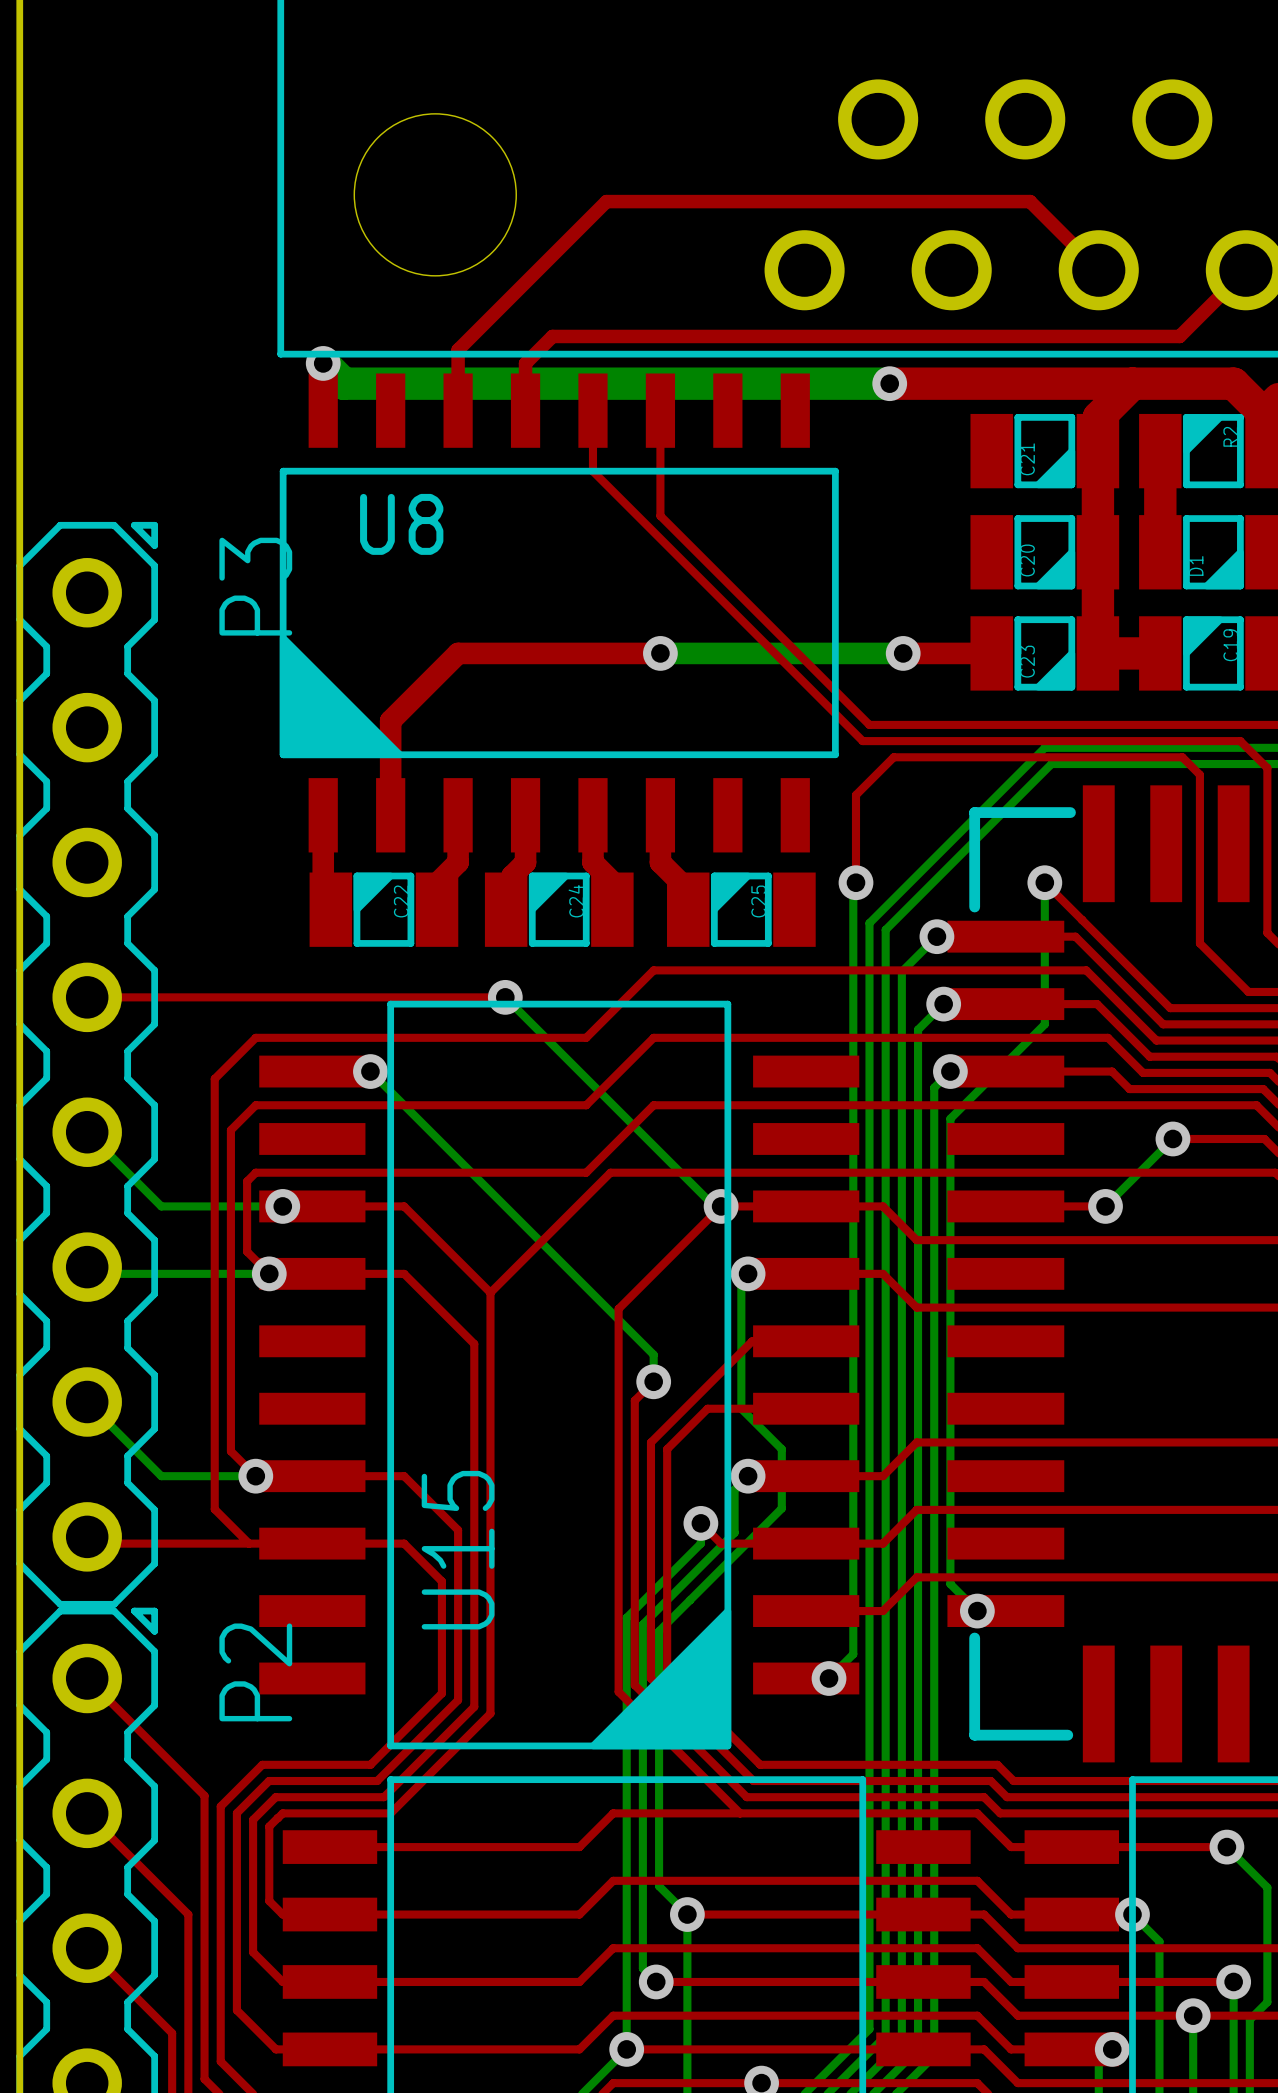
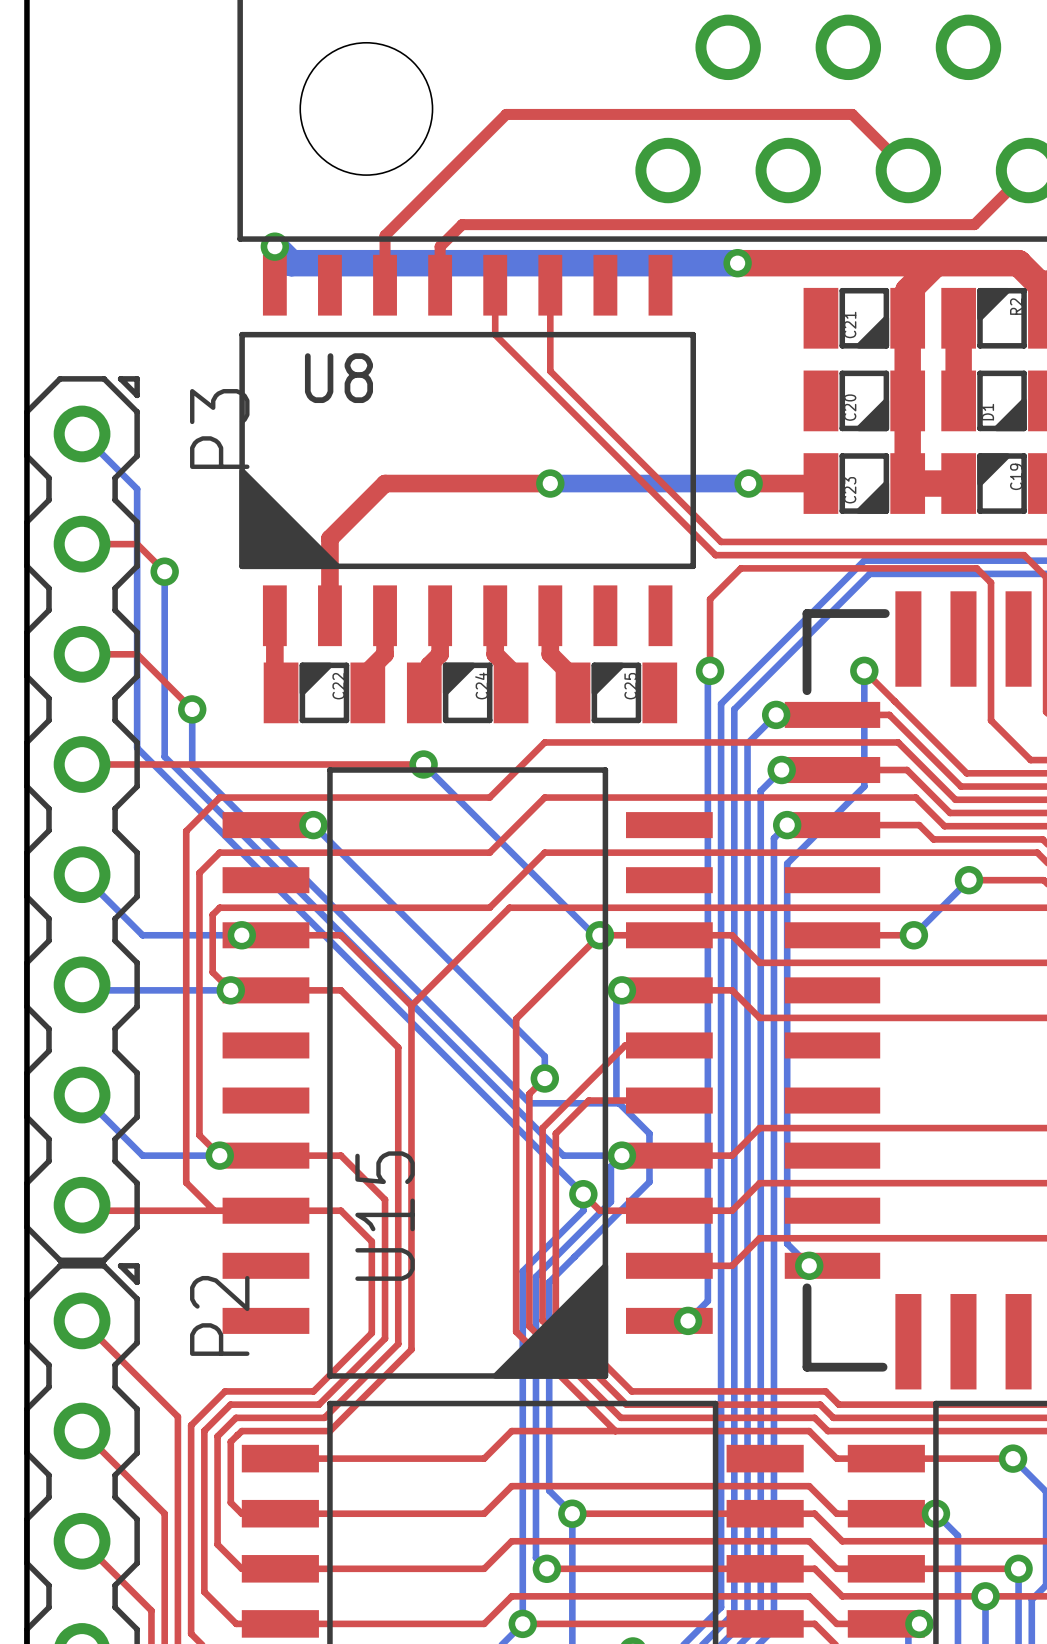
bottom track: none -> (82, 433) (137, 489) (137, 747) (583, 1194)
top track: none -> (82, 544) (137, 544) (164, 571)
bottom track: none -> (164, 571) (164, 756) (563, 1155) (621, 1155)
via: none -> (164, 571)
top track: none -> (82, 654) (137, 654) (192, 709)
bottom track: none -> (192, 709) (192, 765) (529, 1103) (619, 1103)
via: none -> (192, 709)

